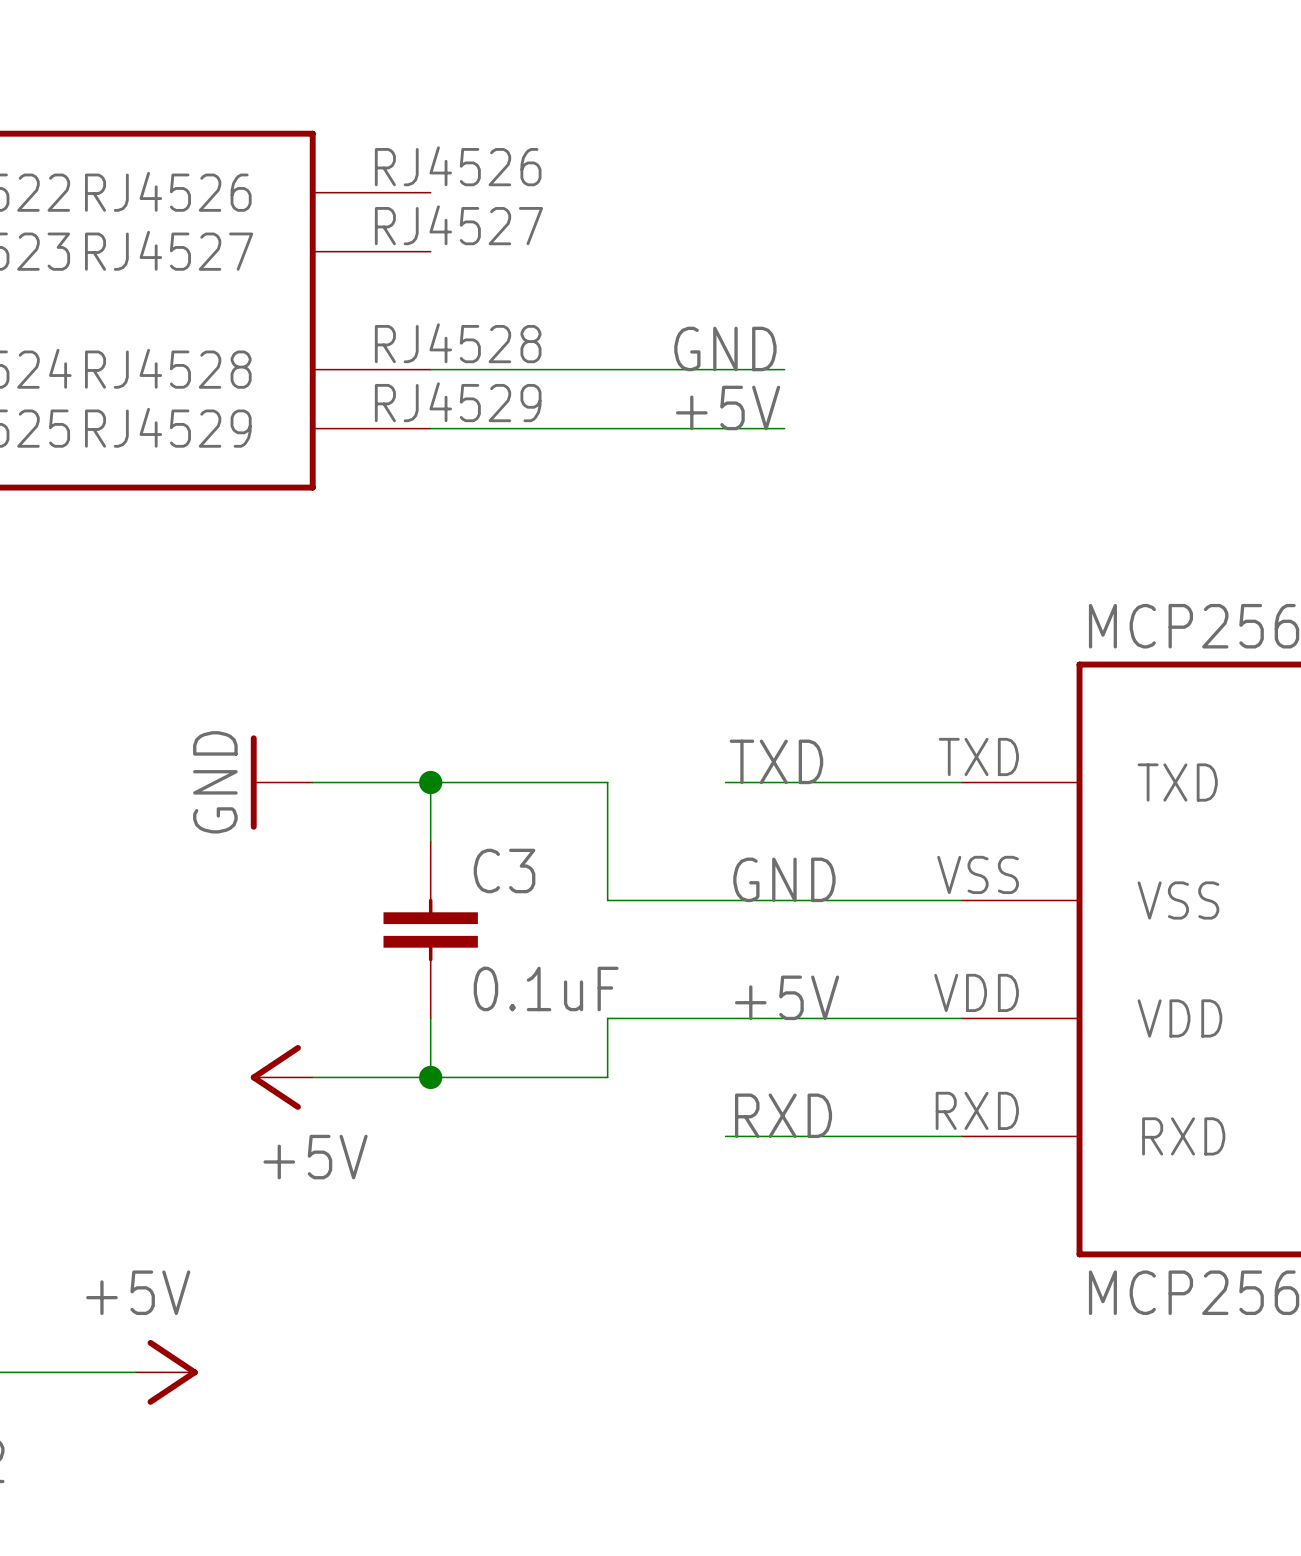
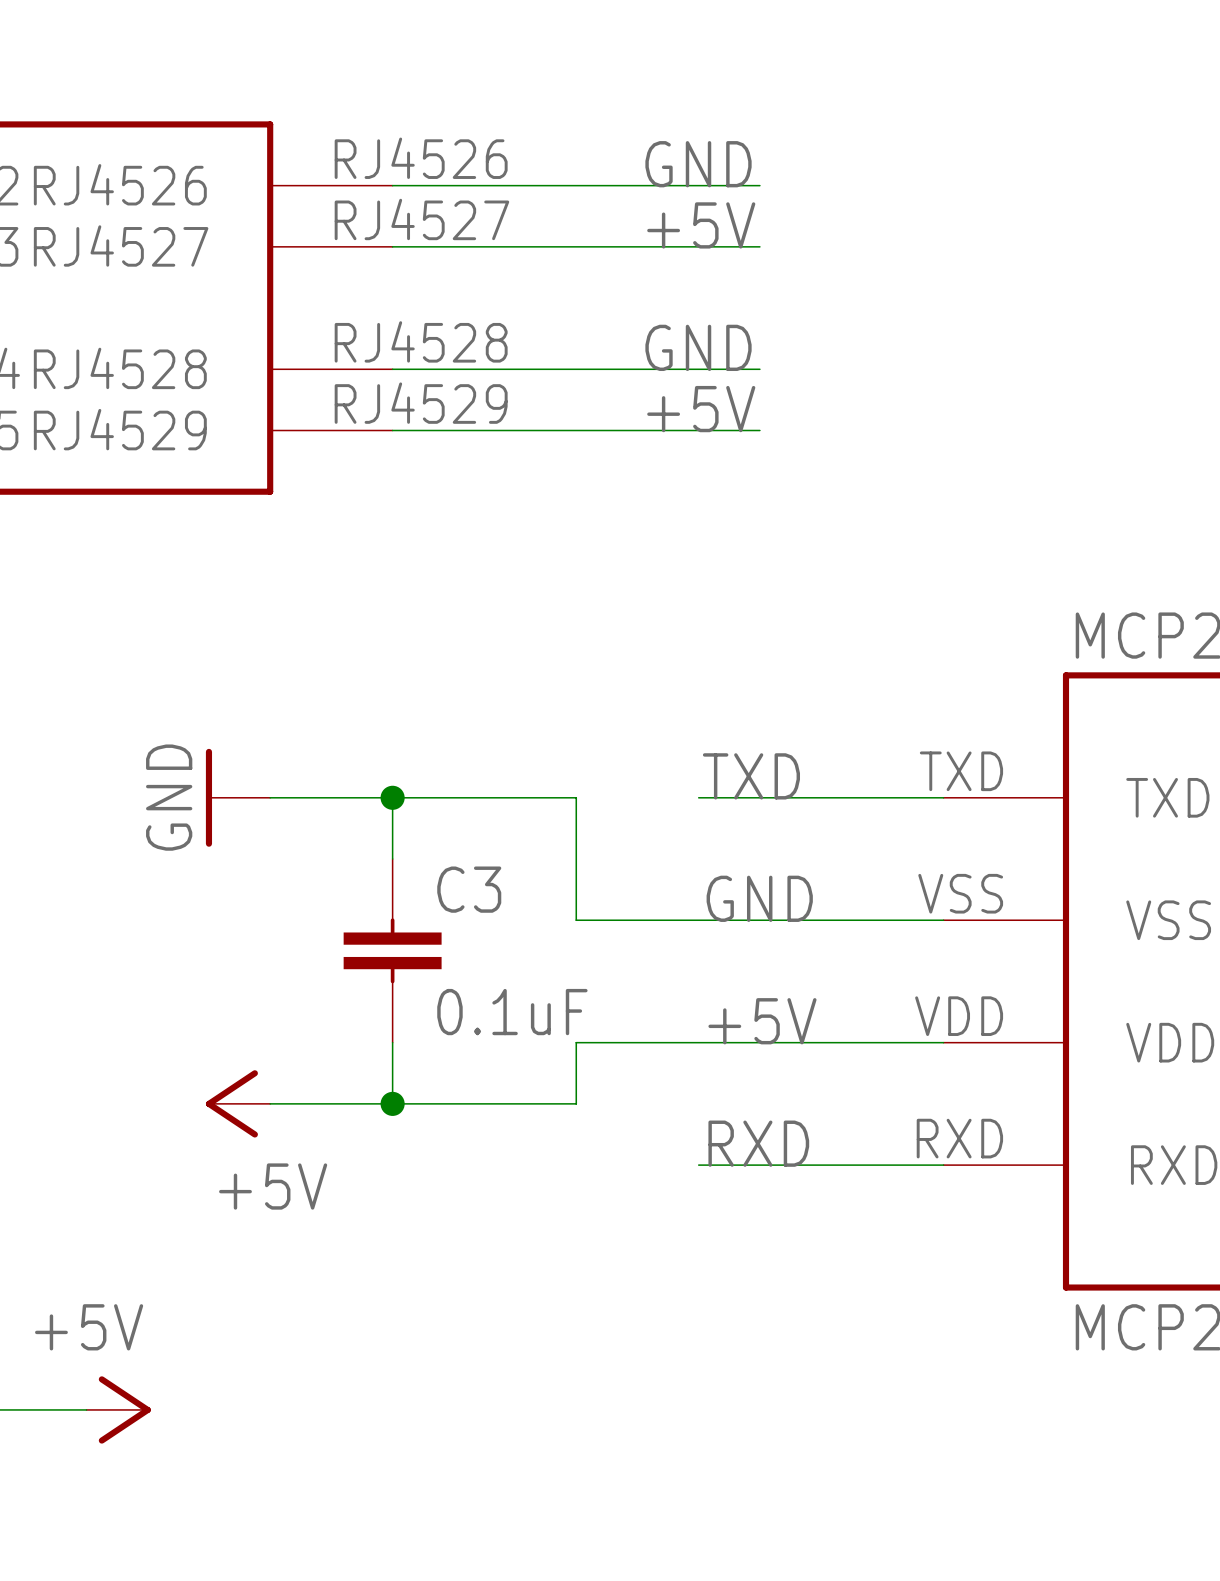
label: none -> GND (698, 164)
wire: none -> (392, 185) (759, 185)
label: none -> +5V (701, 225)
wire: none -> (392, 246) (759, 246)

